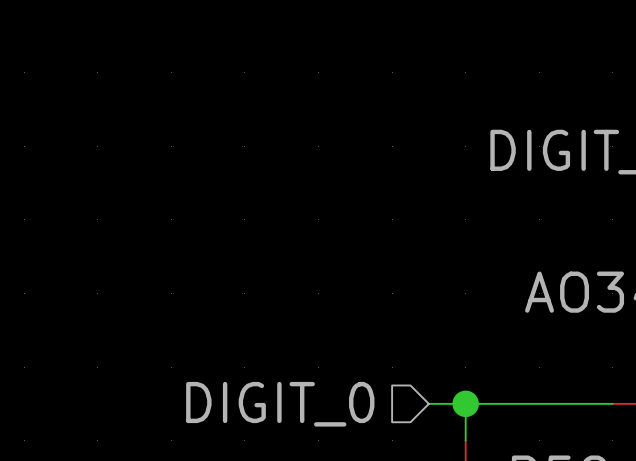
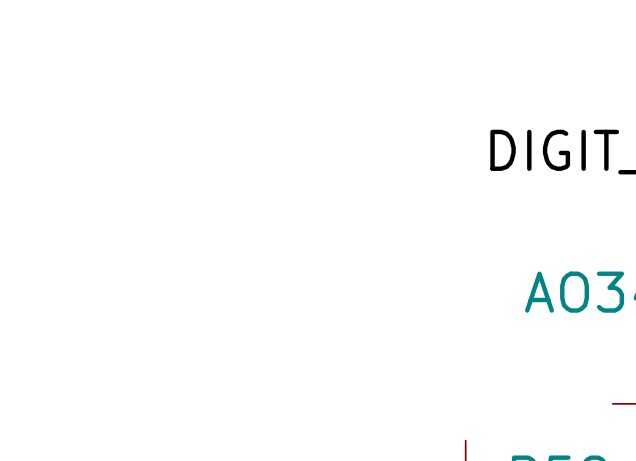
wire: (428, 403) (612, 403) -> none
wire: (465, 403) (465, 440) -> none
junction: (465, 403) -> none
hierarchical label: DIGIT_0 (280, 404) -> none

